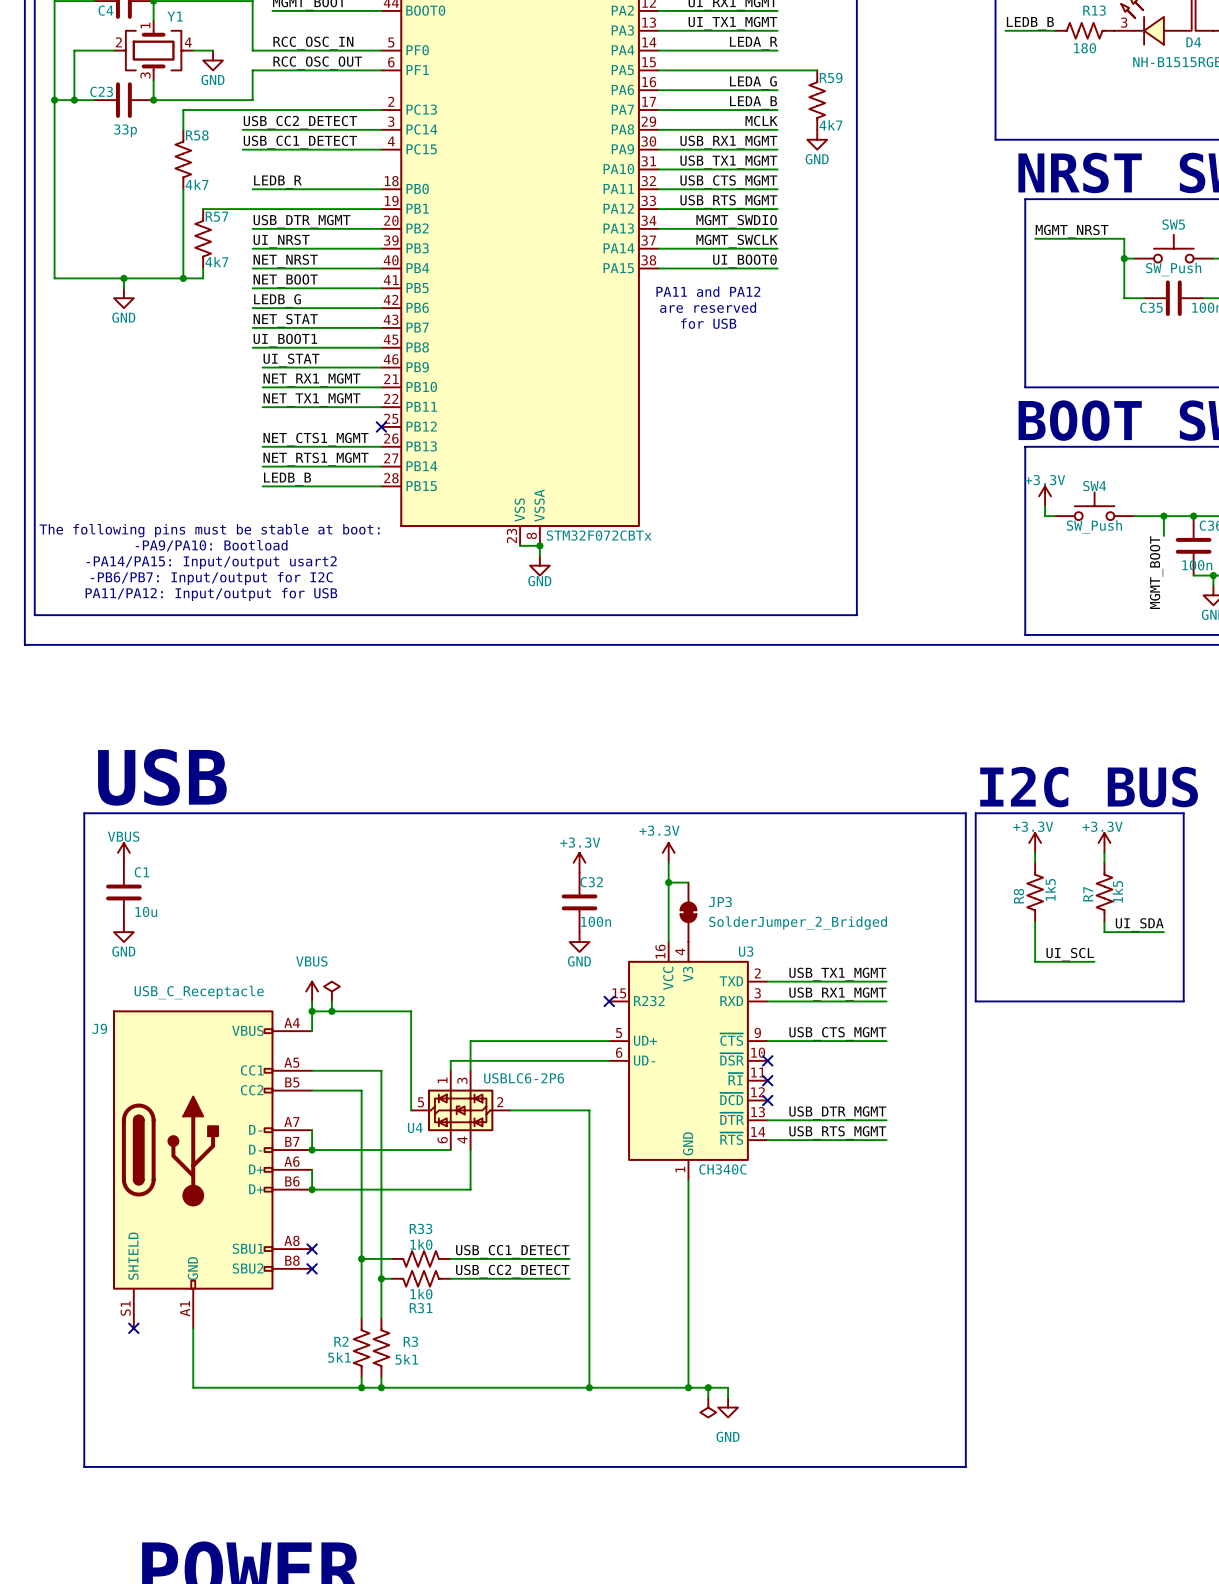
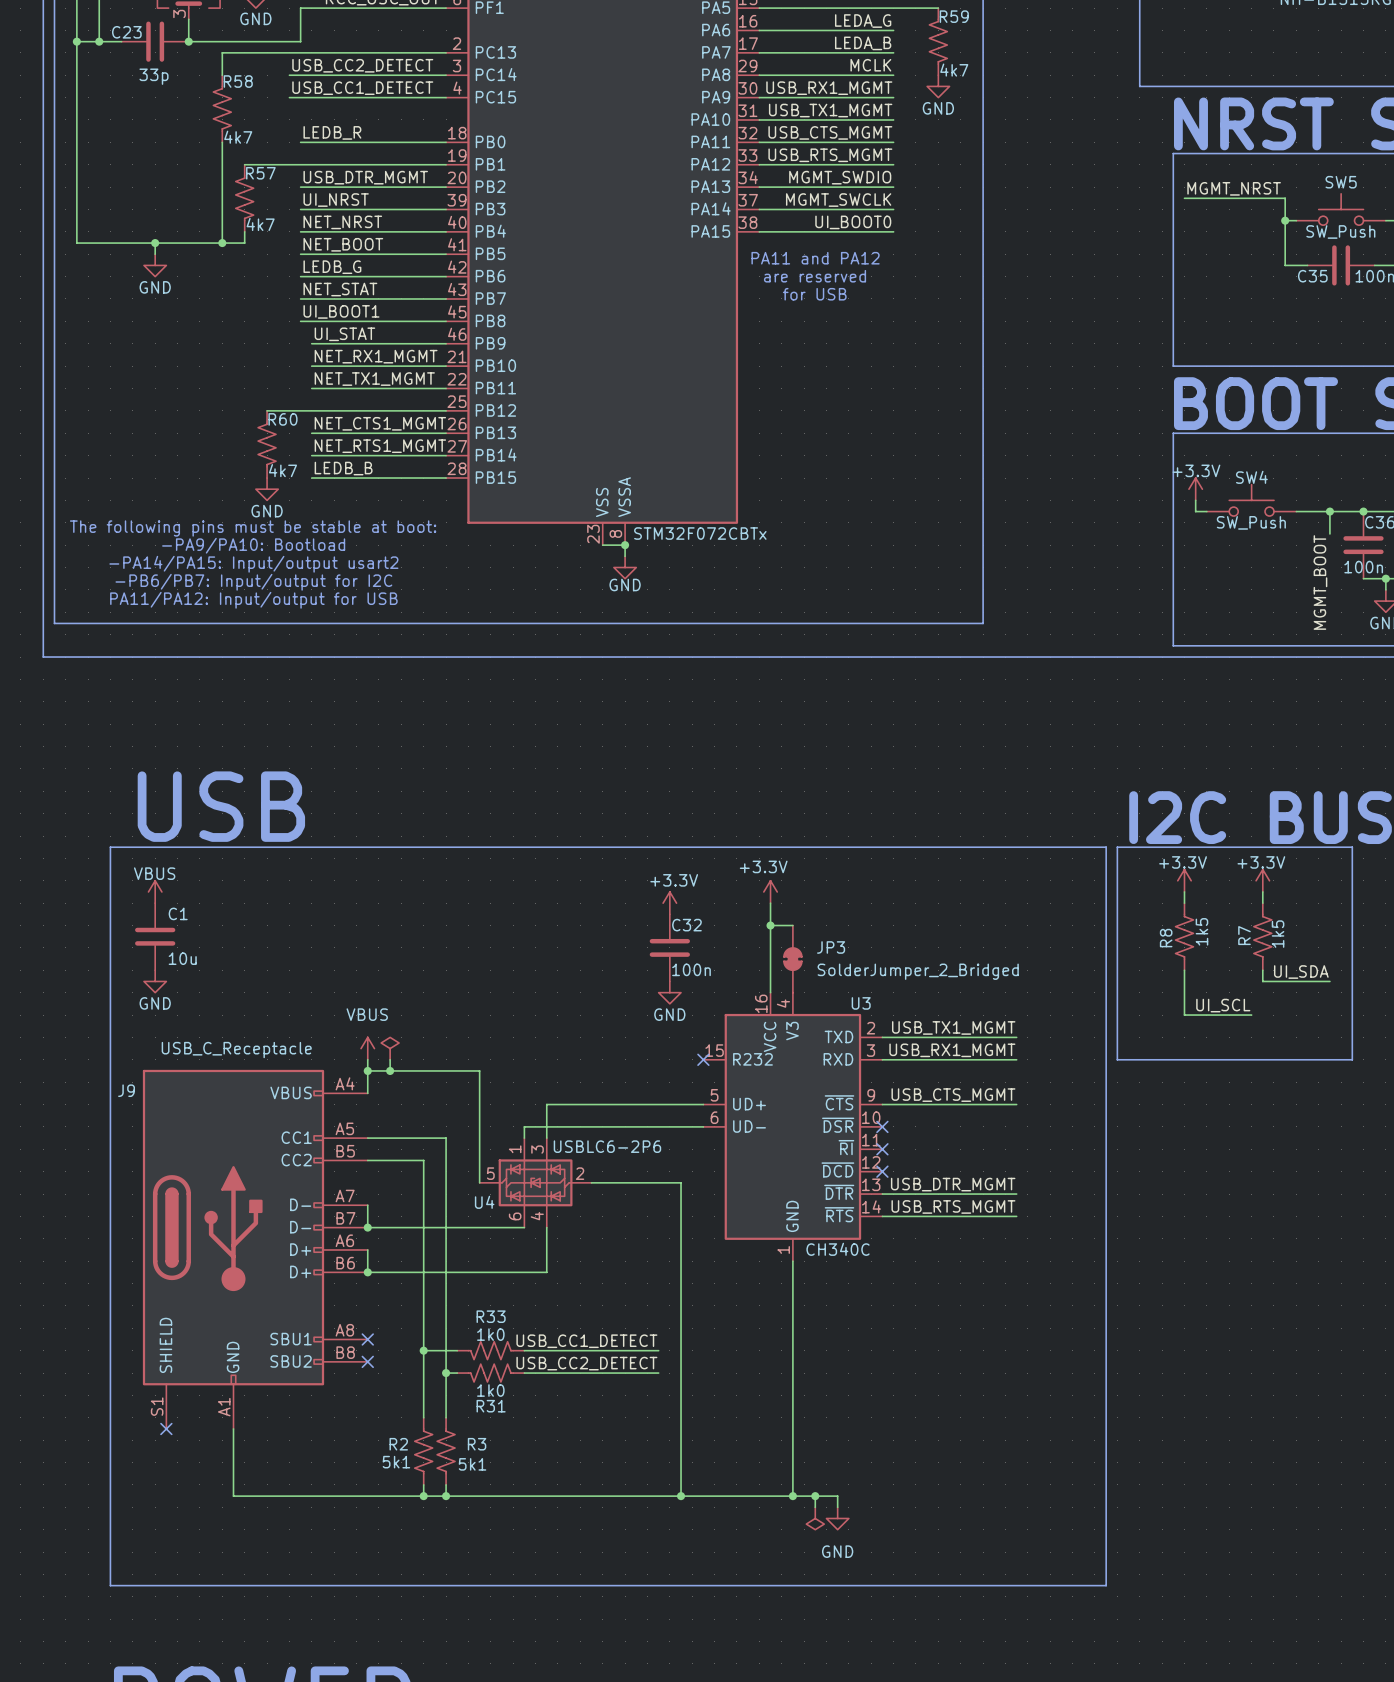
wire: none -> (267, 410) (446, 410)
no-connect mark: (381, 426) -> none
R60: none -> 4k7 (267, 444)
power symbol: none -> GND (267, 489)

